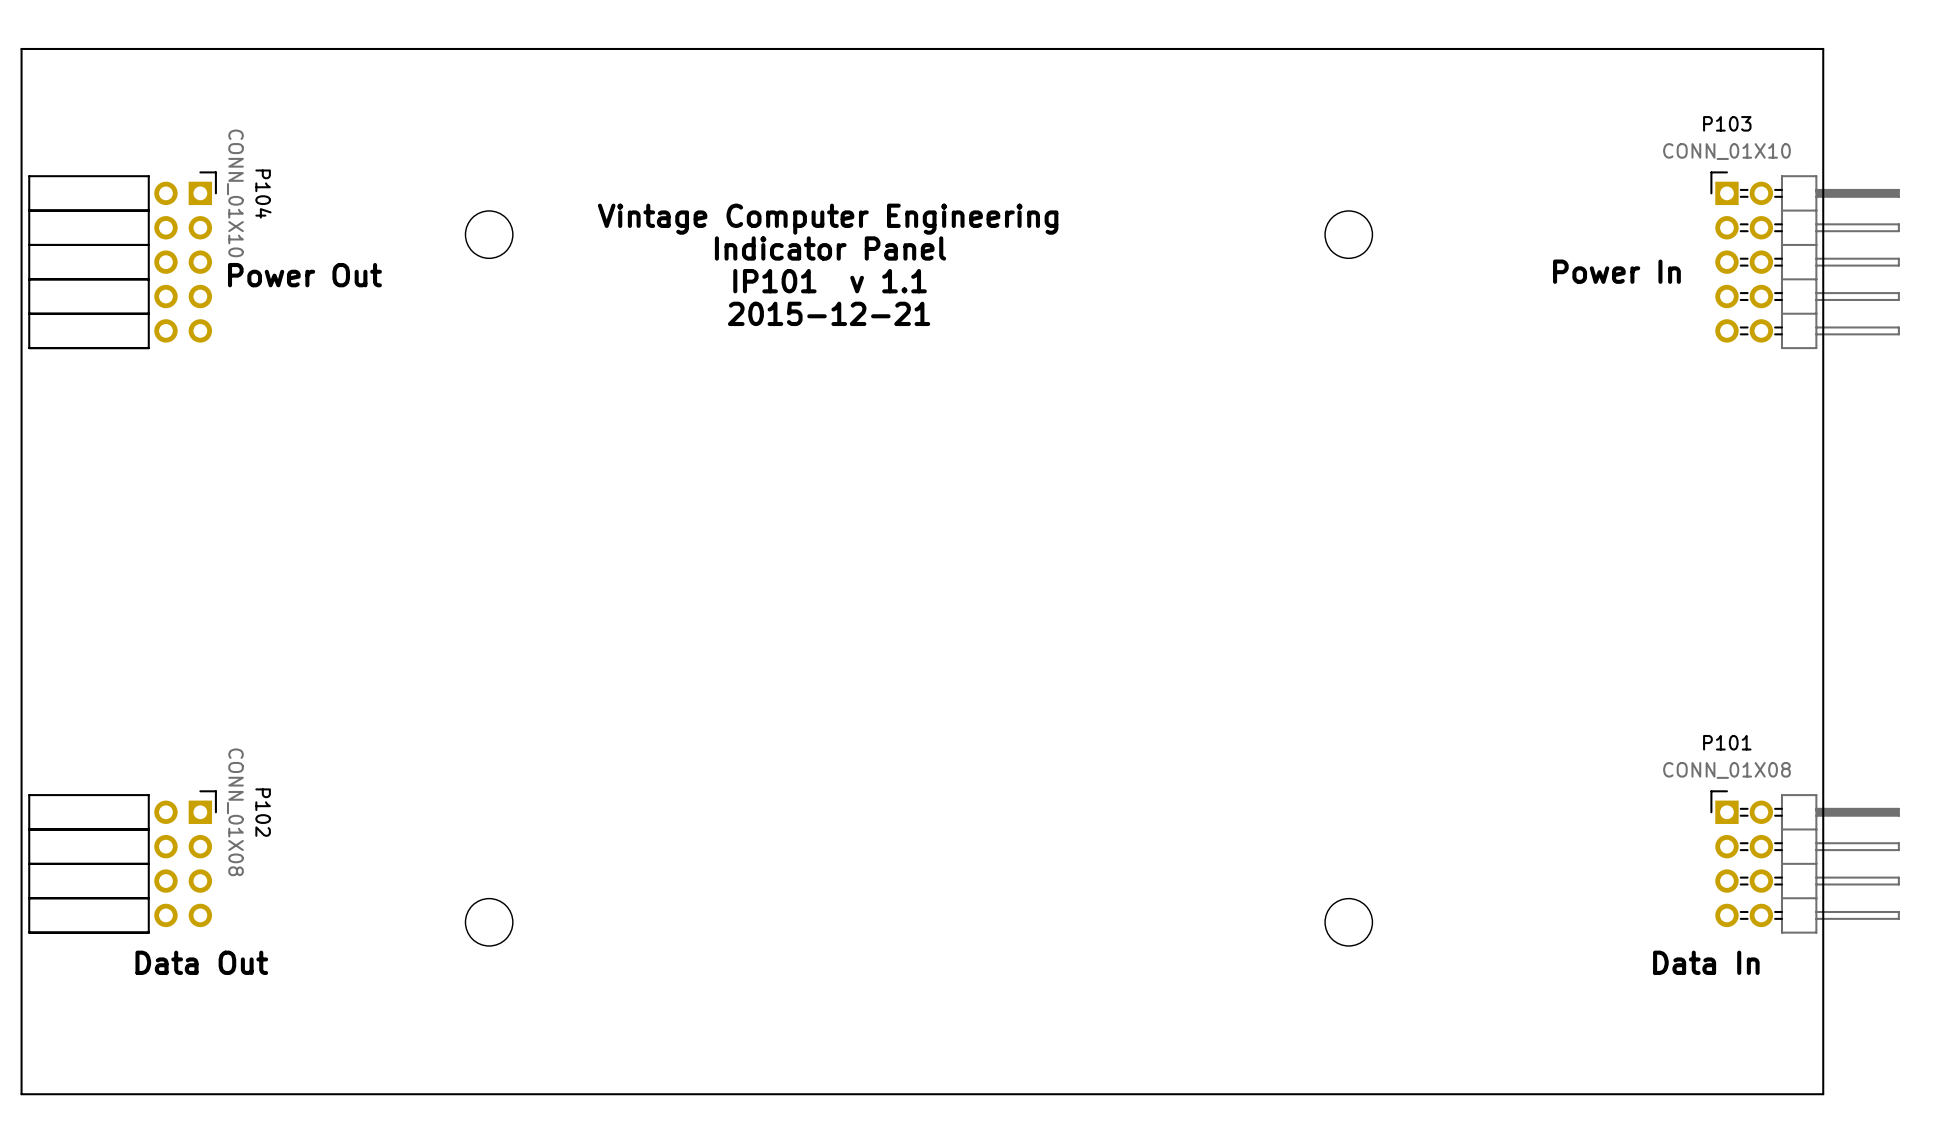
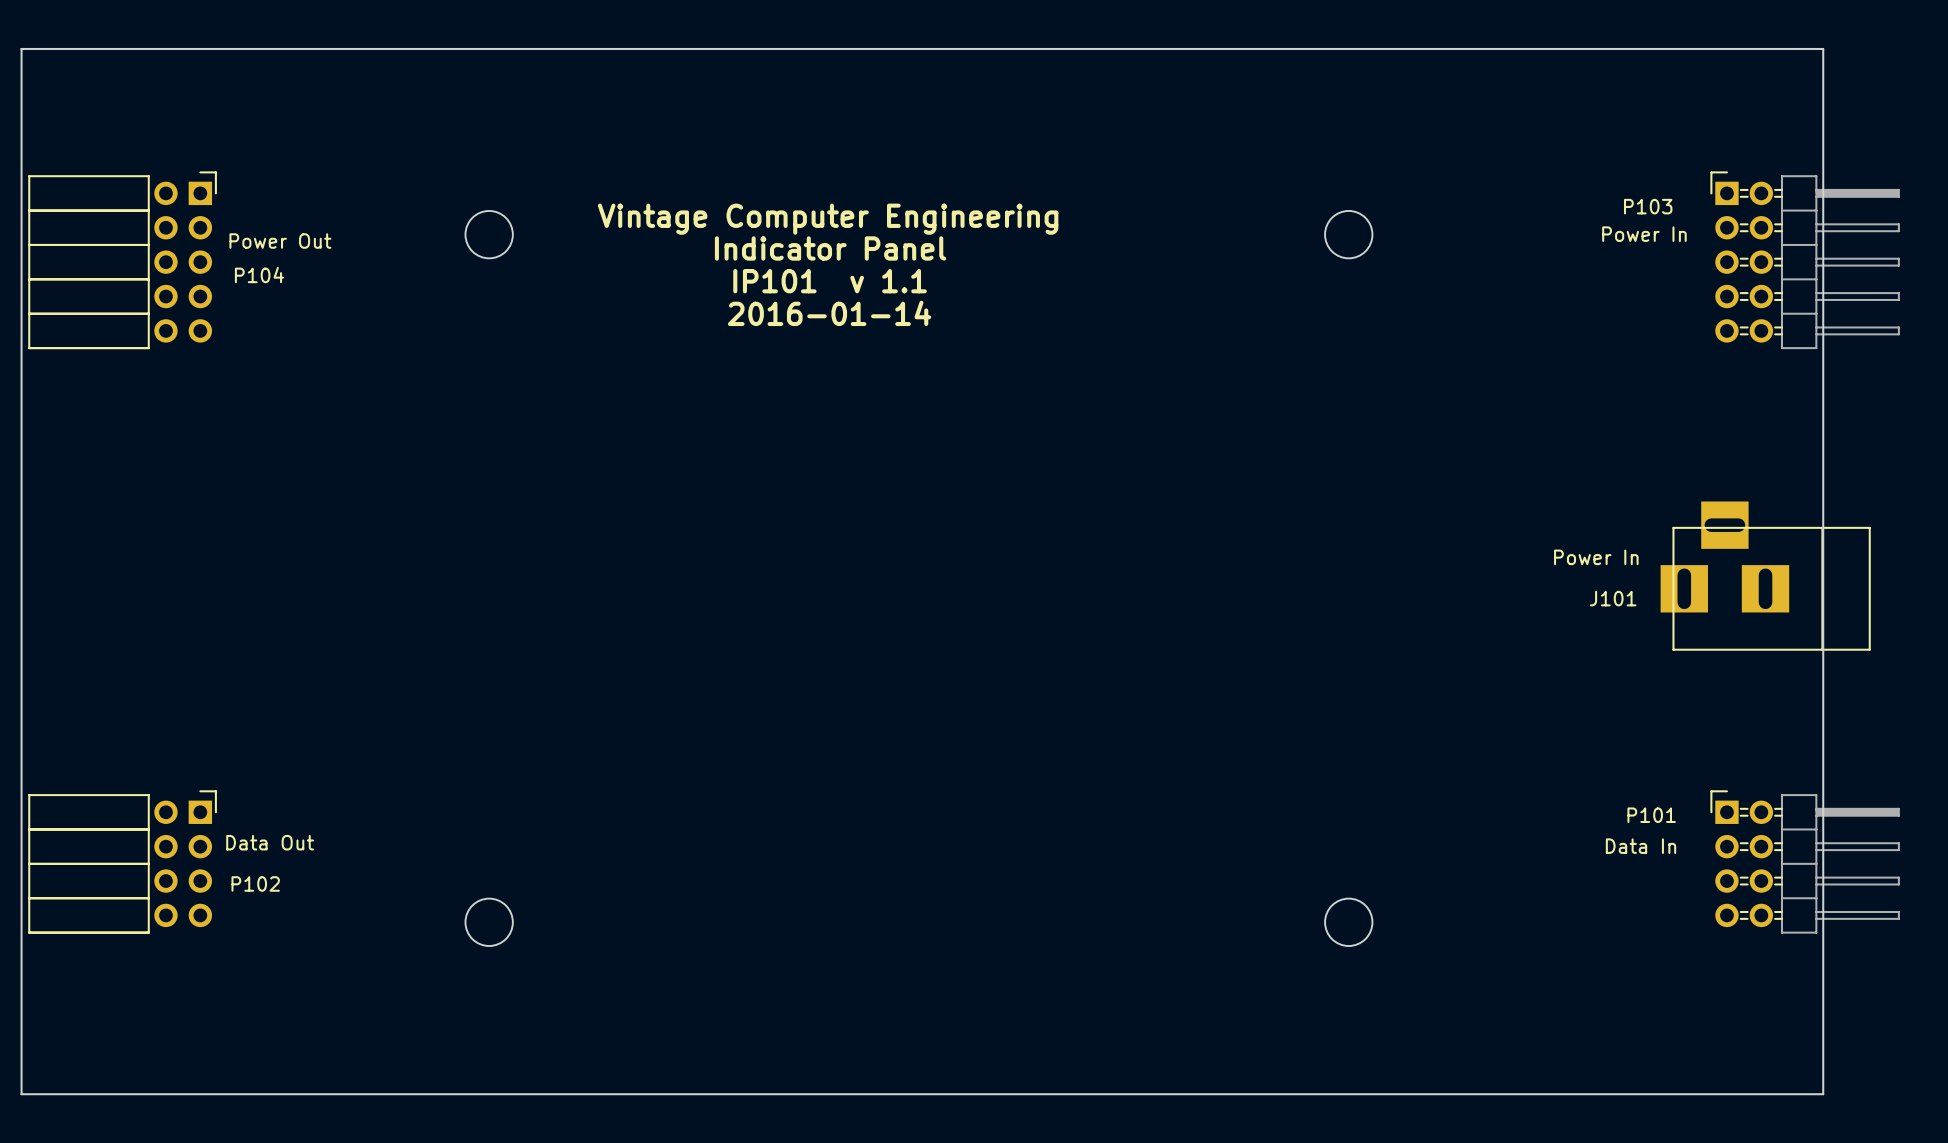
P103 name position: P103 (1727, 123) -> P103 (1648, 206)
P103 value: CONN_01X10 (1726, 151) -> Power In (1644, 234)
P104 value: CONN_01X10 (235, 193) -> Power Out (280, 241)
P104 name rotation: 0° (263, 194) -> 90° counterclockwise (259, 275)
P104 name position: P104 (263, 194) -> P104 (259, 275)
text: Power In (1616, 271) -> none
text: Power Out (304, 275) -> none
text: 2015-12-21 (829, 313) -> 2016-01-14 (829, 313)
J101: none -> Power In (1765, 576)
P101 name position: P101 (1727, 742) -> P101 (1651, 815)
P101 value: CONN_01X08 (1726, 770) -> Data In (1641, 846)
P102 value: CONN_01X08 (235, 812) -> Data Out (270, 842)
P102 name rotation: 0° (263, 812) -> 90° counterclockwise (255, 883)
P102 name position: P102 (263, 812) -> P102 (255, 883)
text: Data Out (201, 962) -> none
text: Data In (1706, 962) -> none

